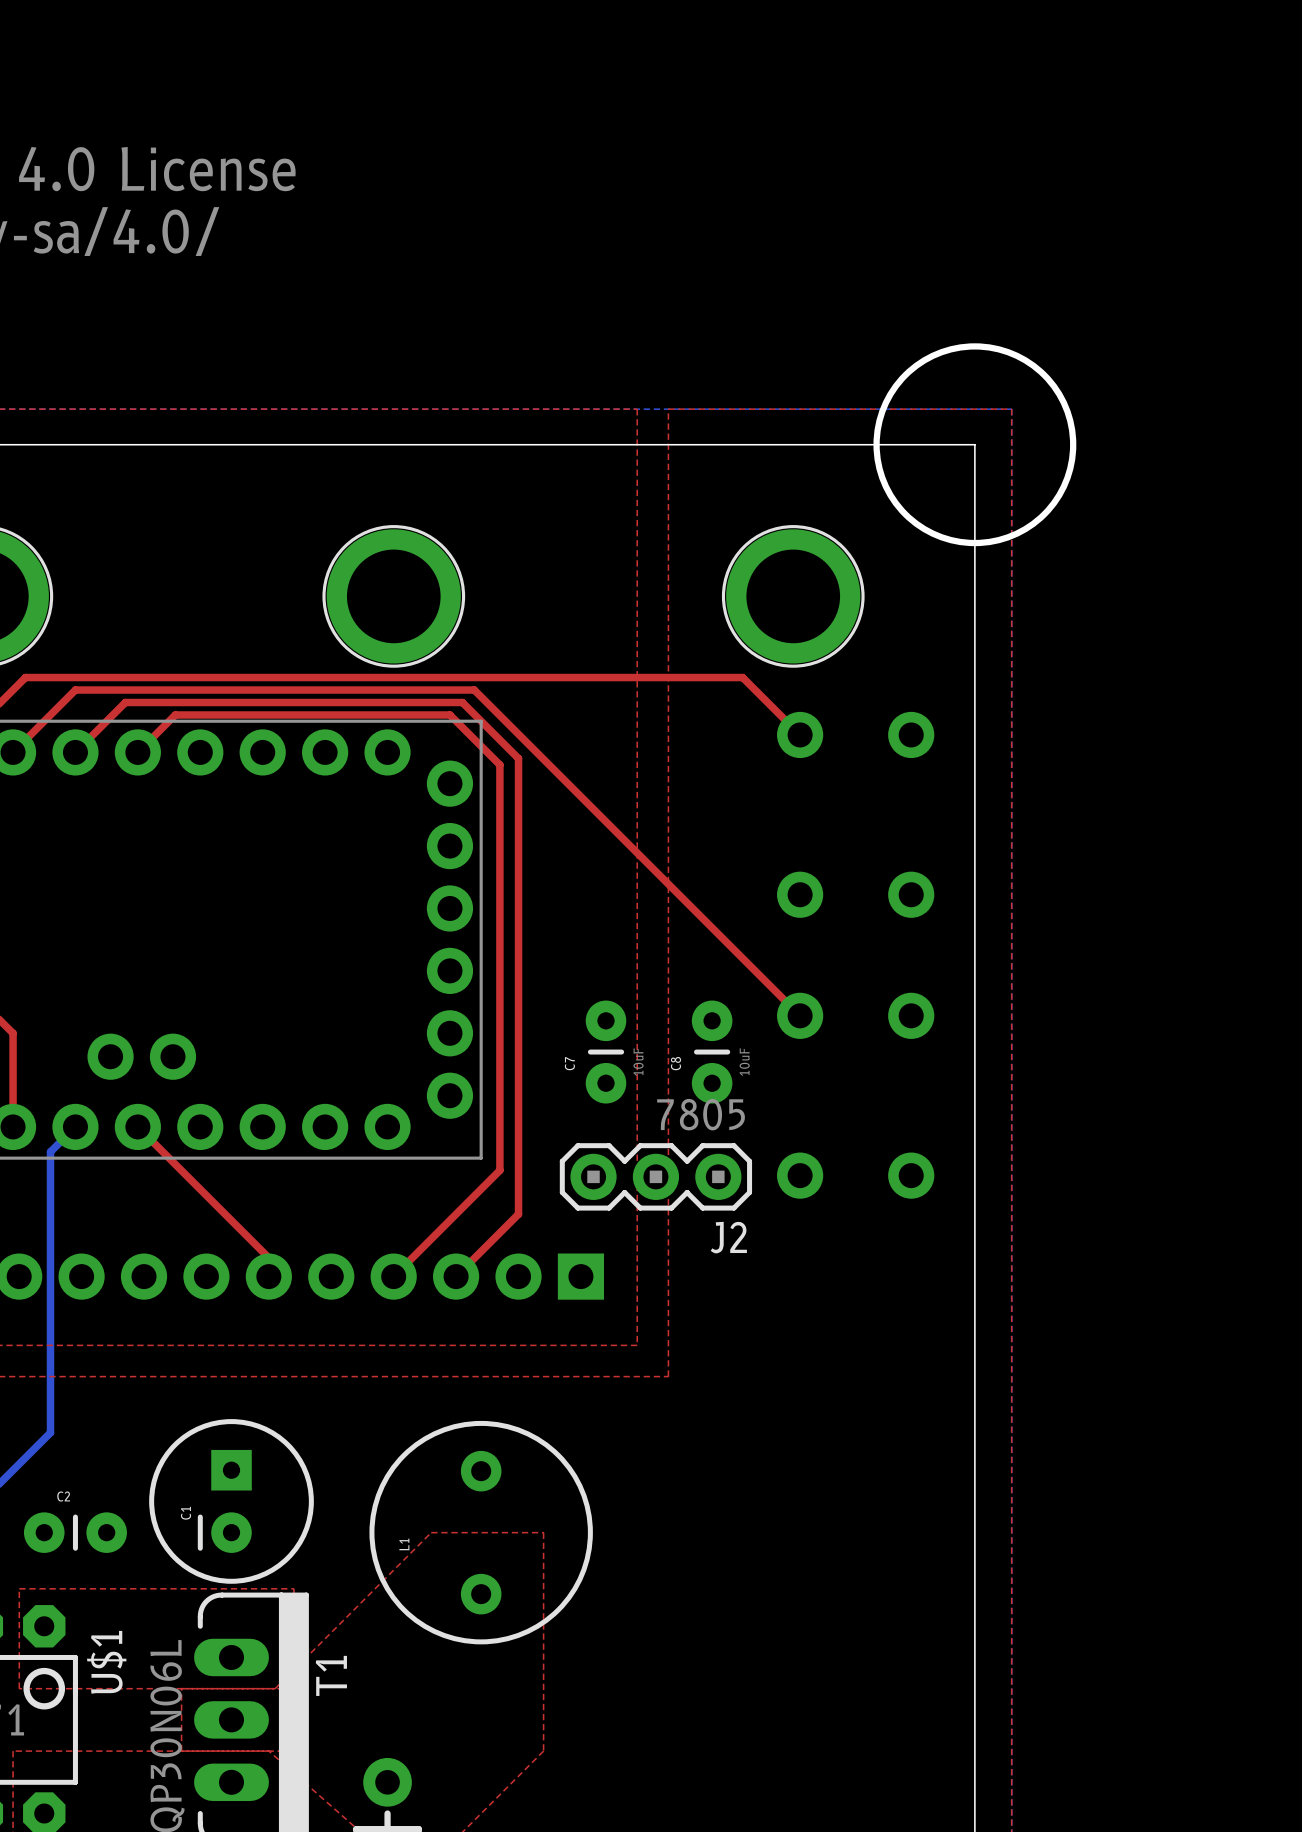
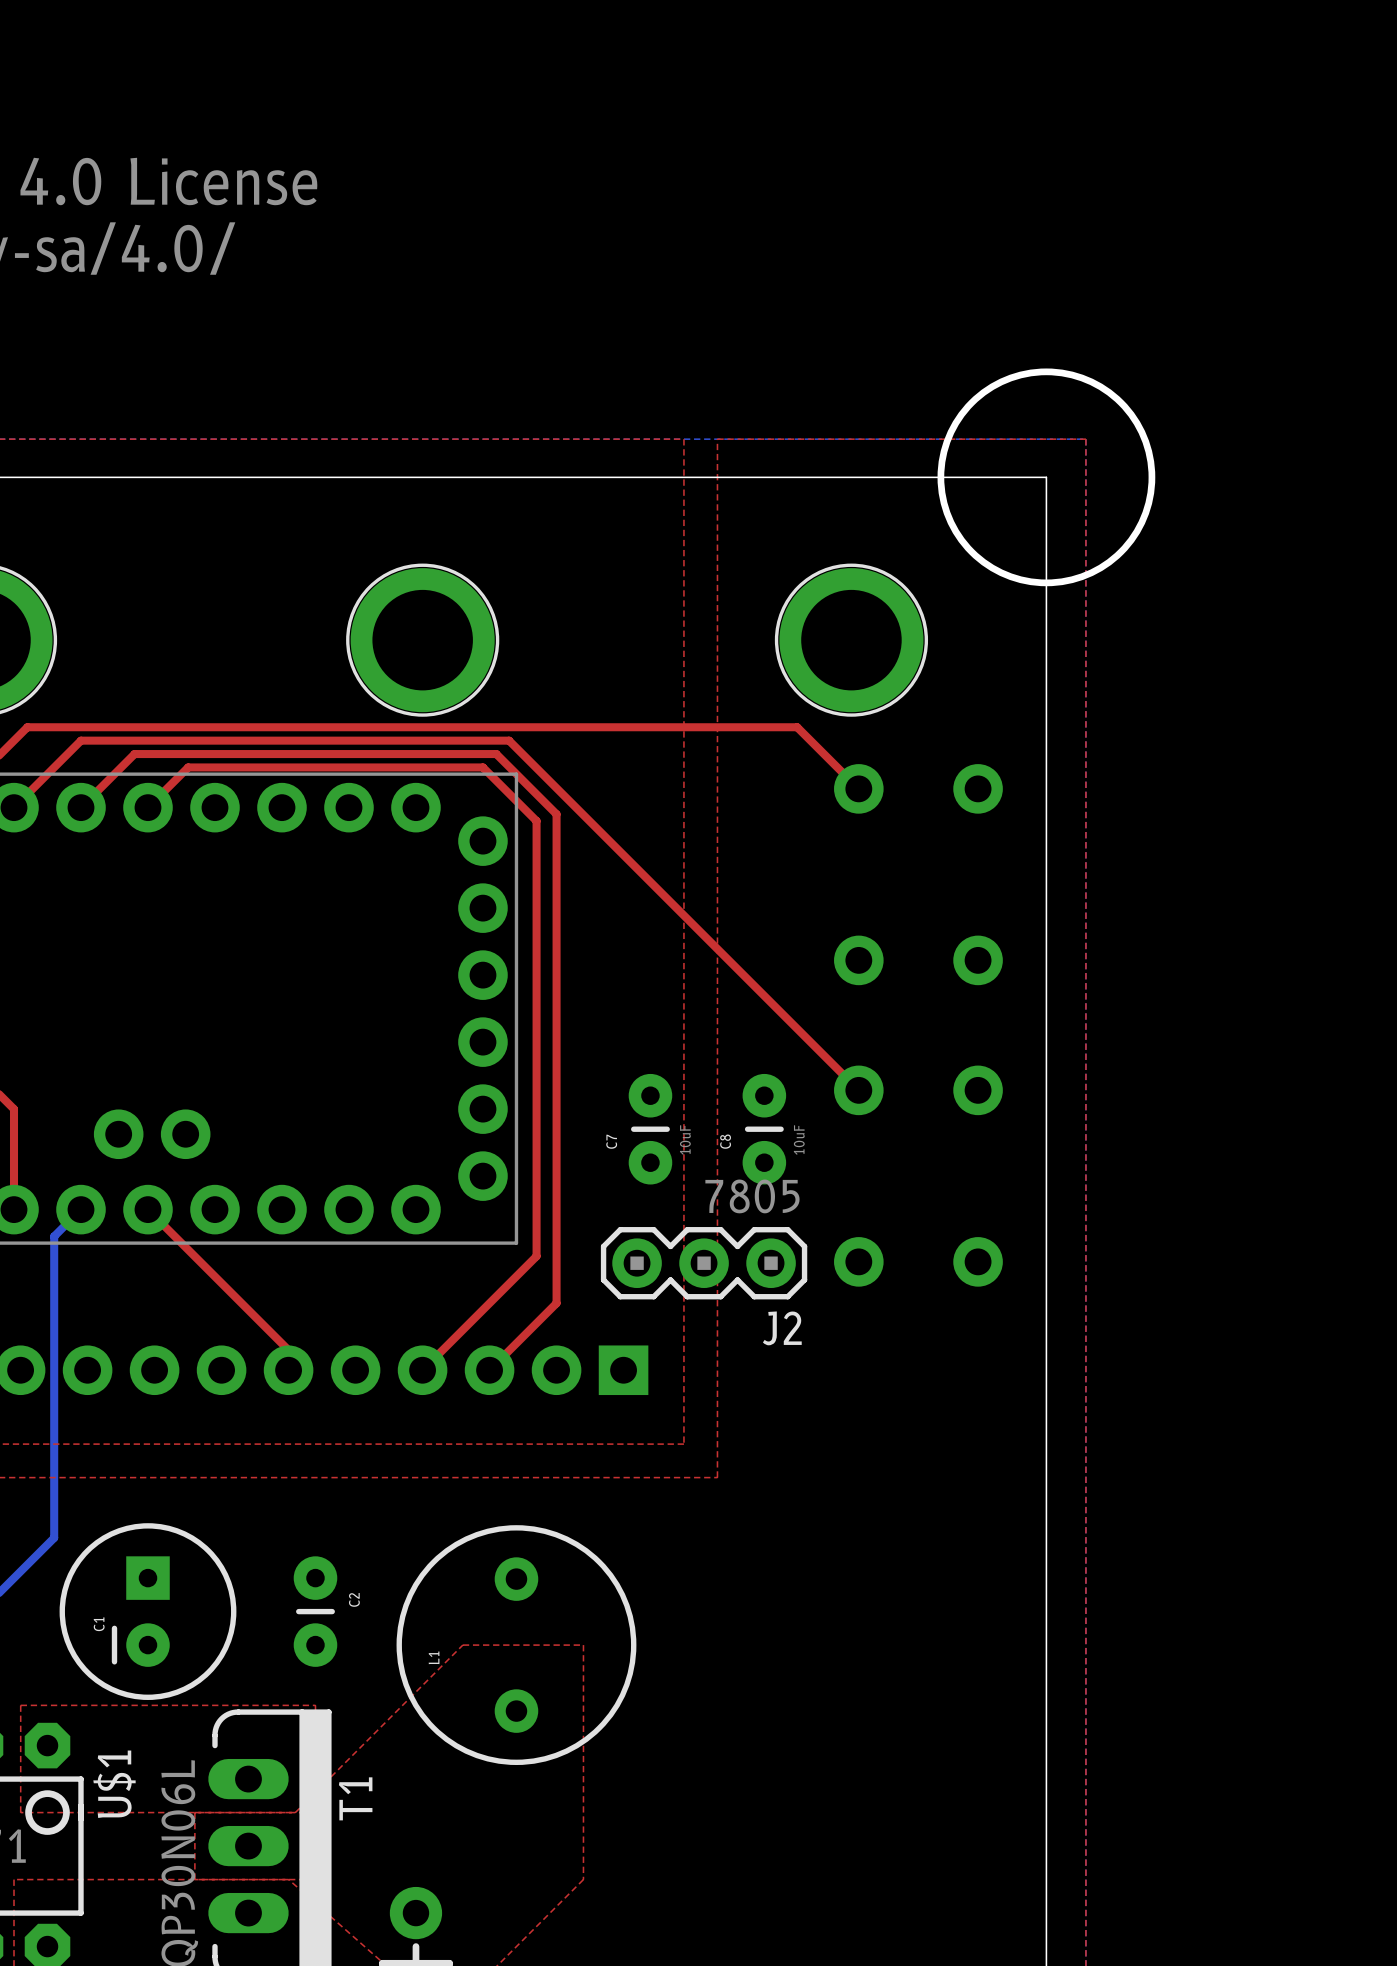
C1 position: (231, 1501) -> (147, 1611)
C2 rotation: 0° (75, 1532) -> 90° clockwise (315, 1611)
C2 position: (75, 1532) -> (315, 1611)

